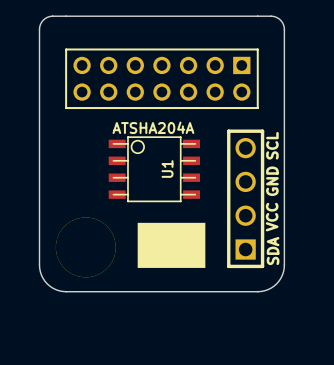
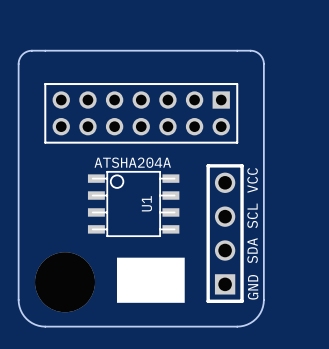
text: SCL (272, 145) -> VCC (252, 180)
text: GND (272, 181) -> SCL (252, 215)
text: VCC (272, 217) -> SDA (252, 250)
text: SDA (273, 251) -> GND (253, 287)

